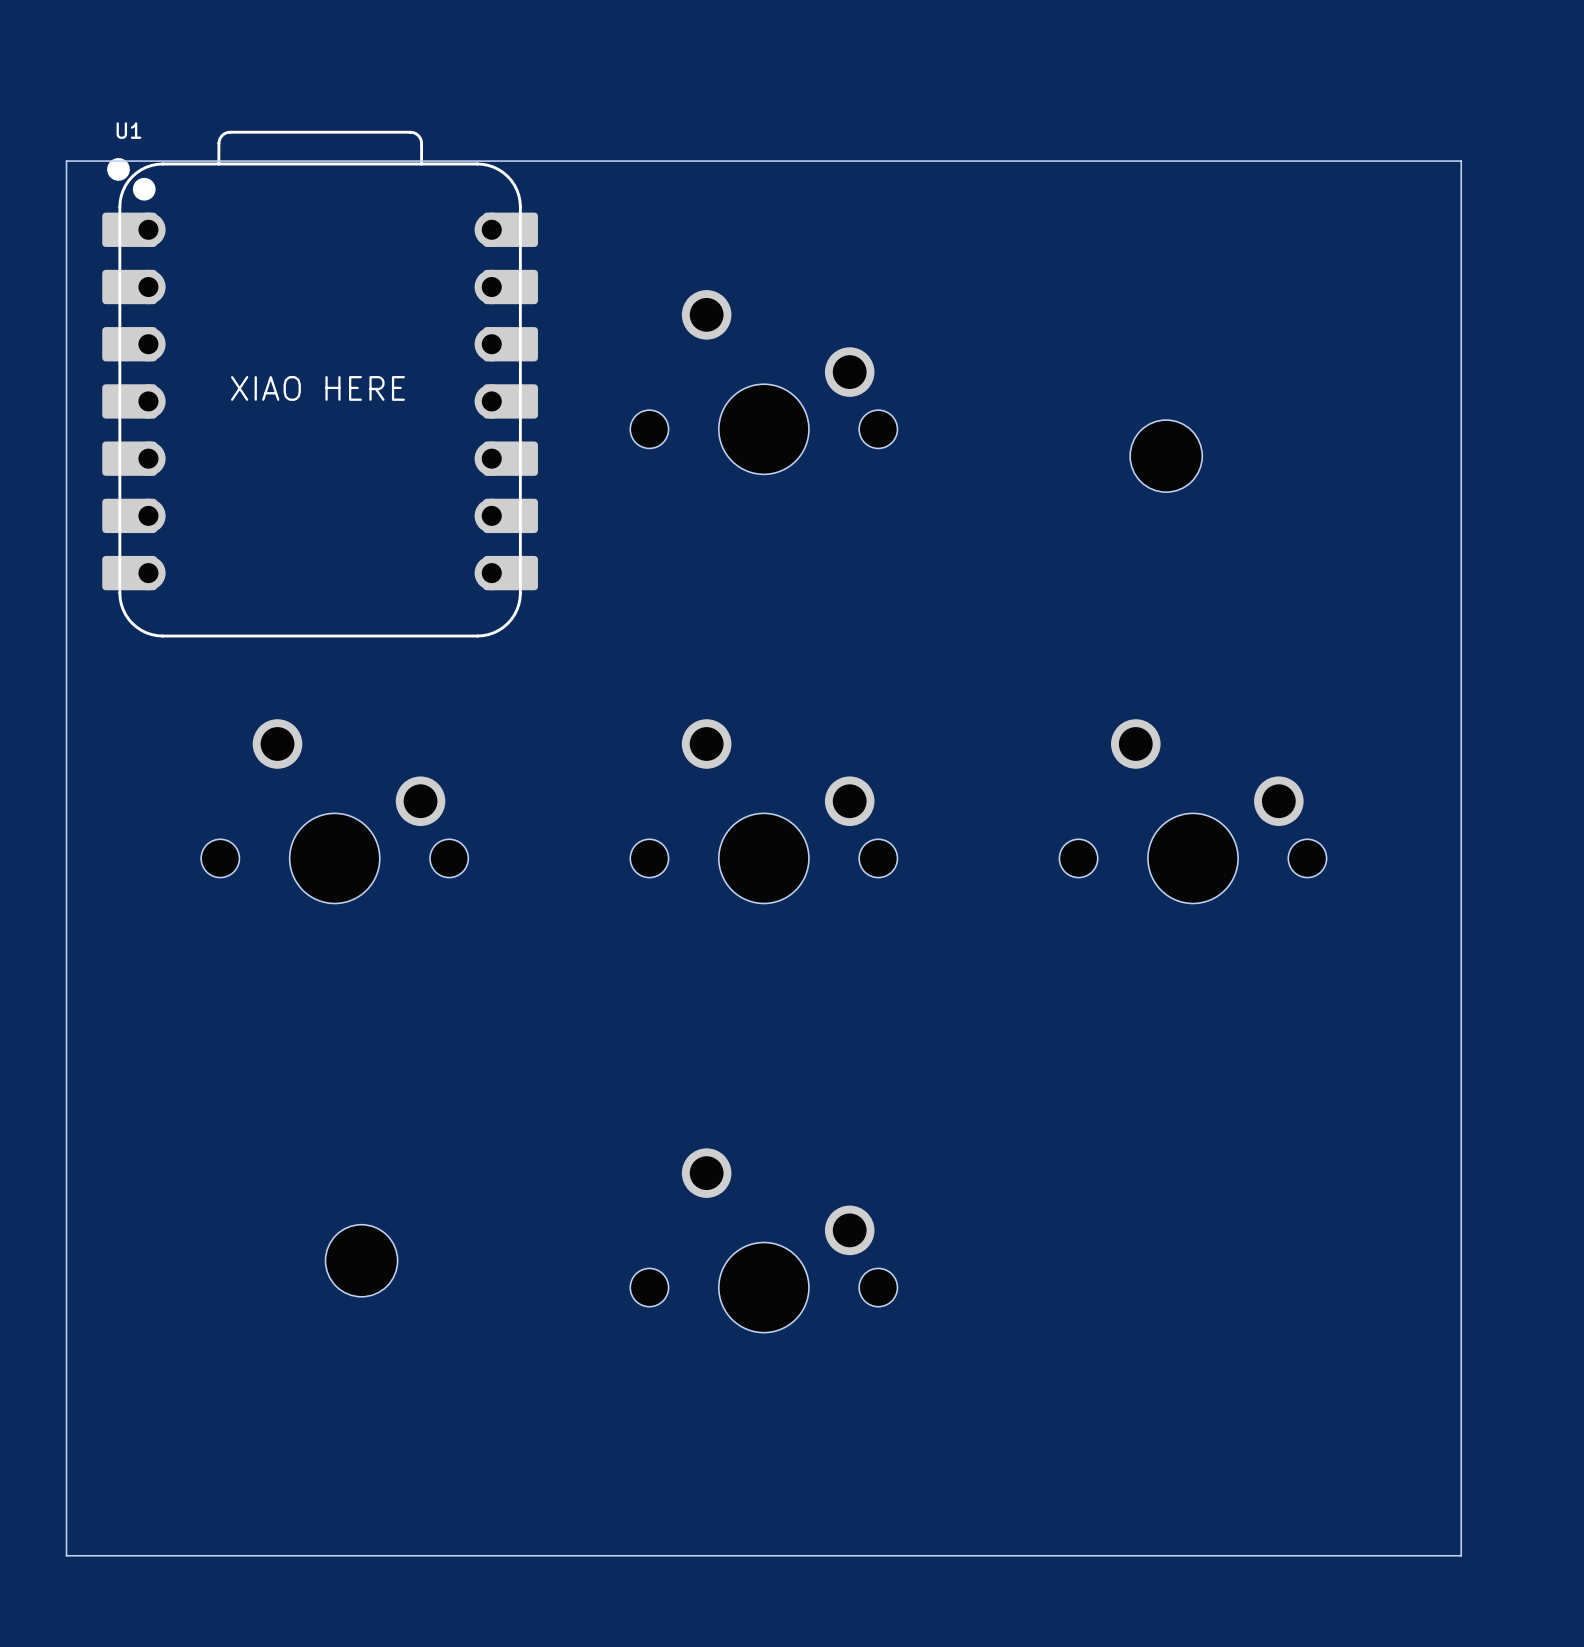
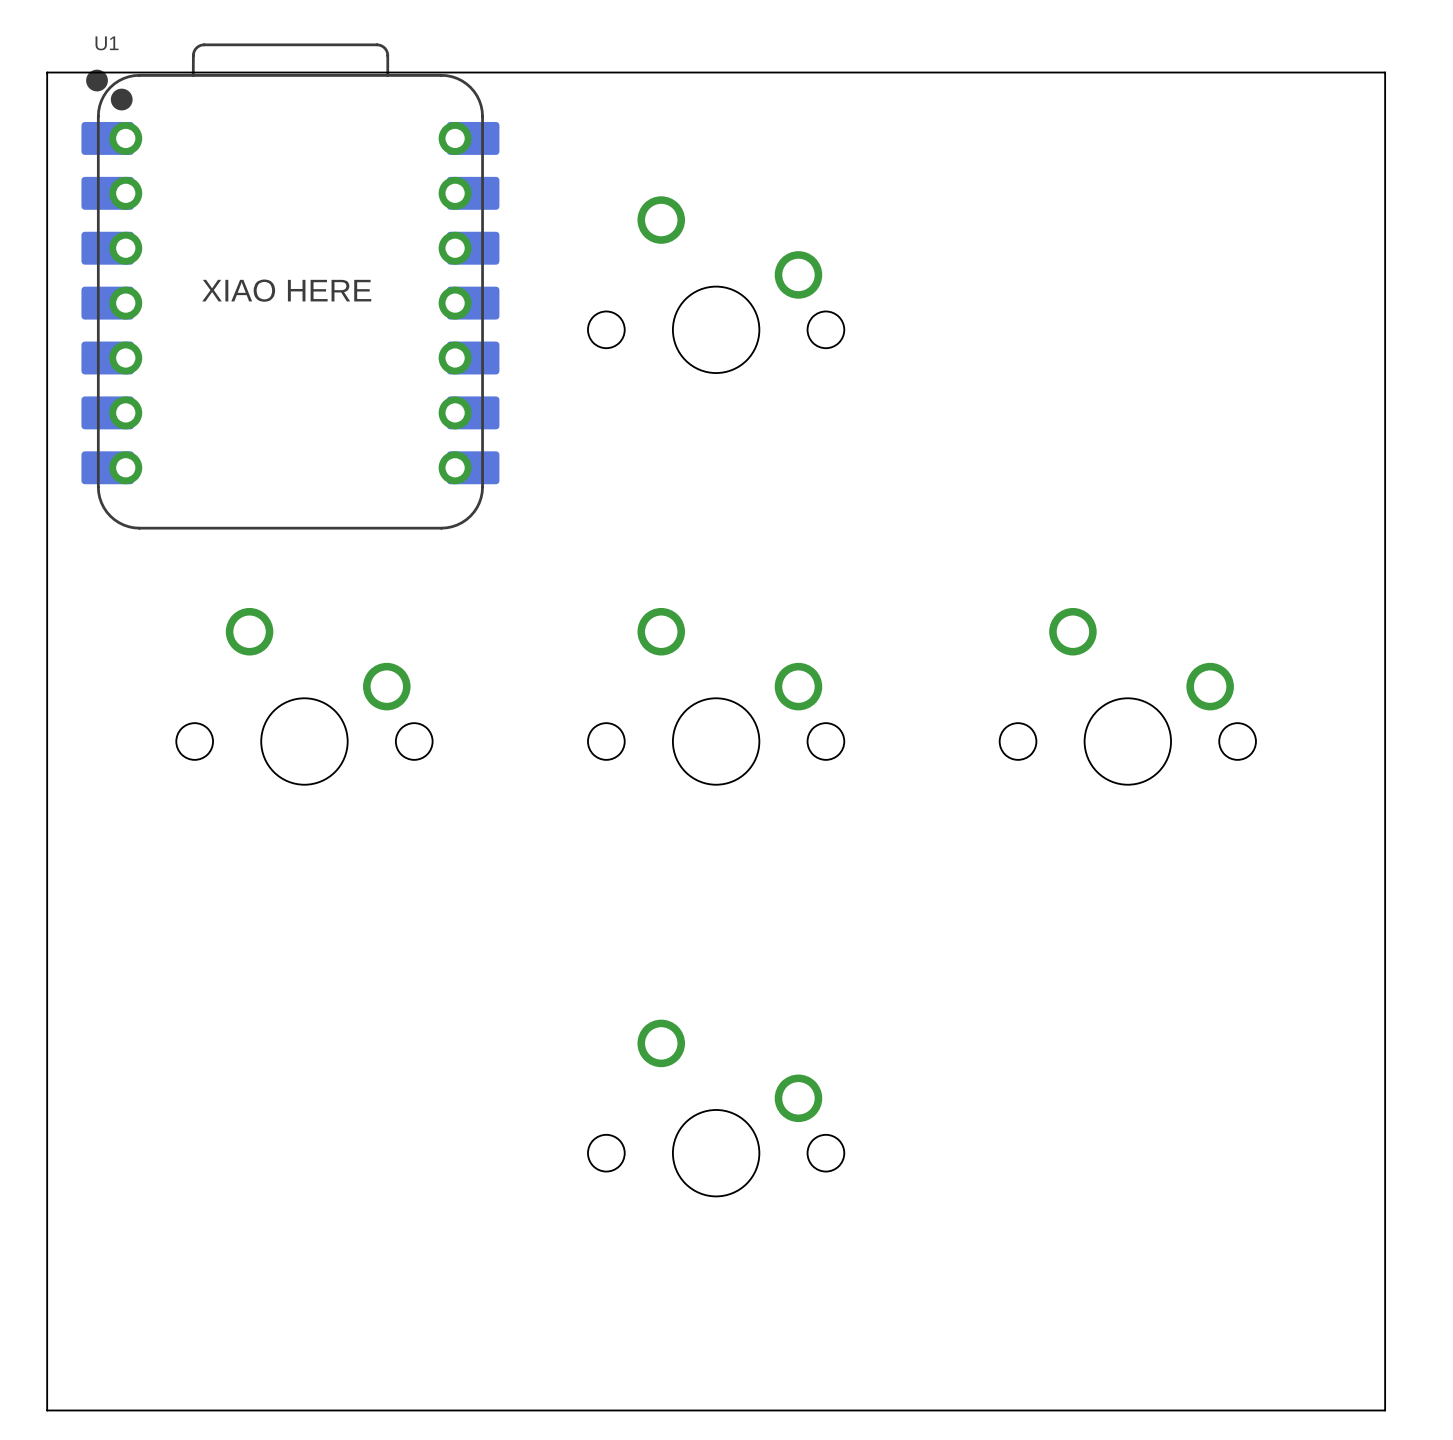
part: (1166, 456) -> none
part: (361, 1260) -> none

